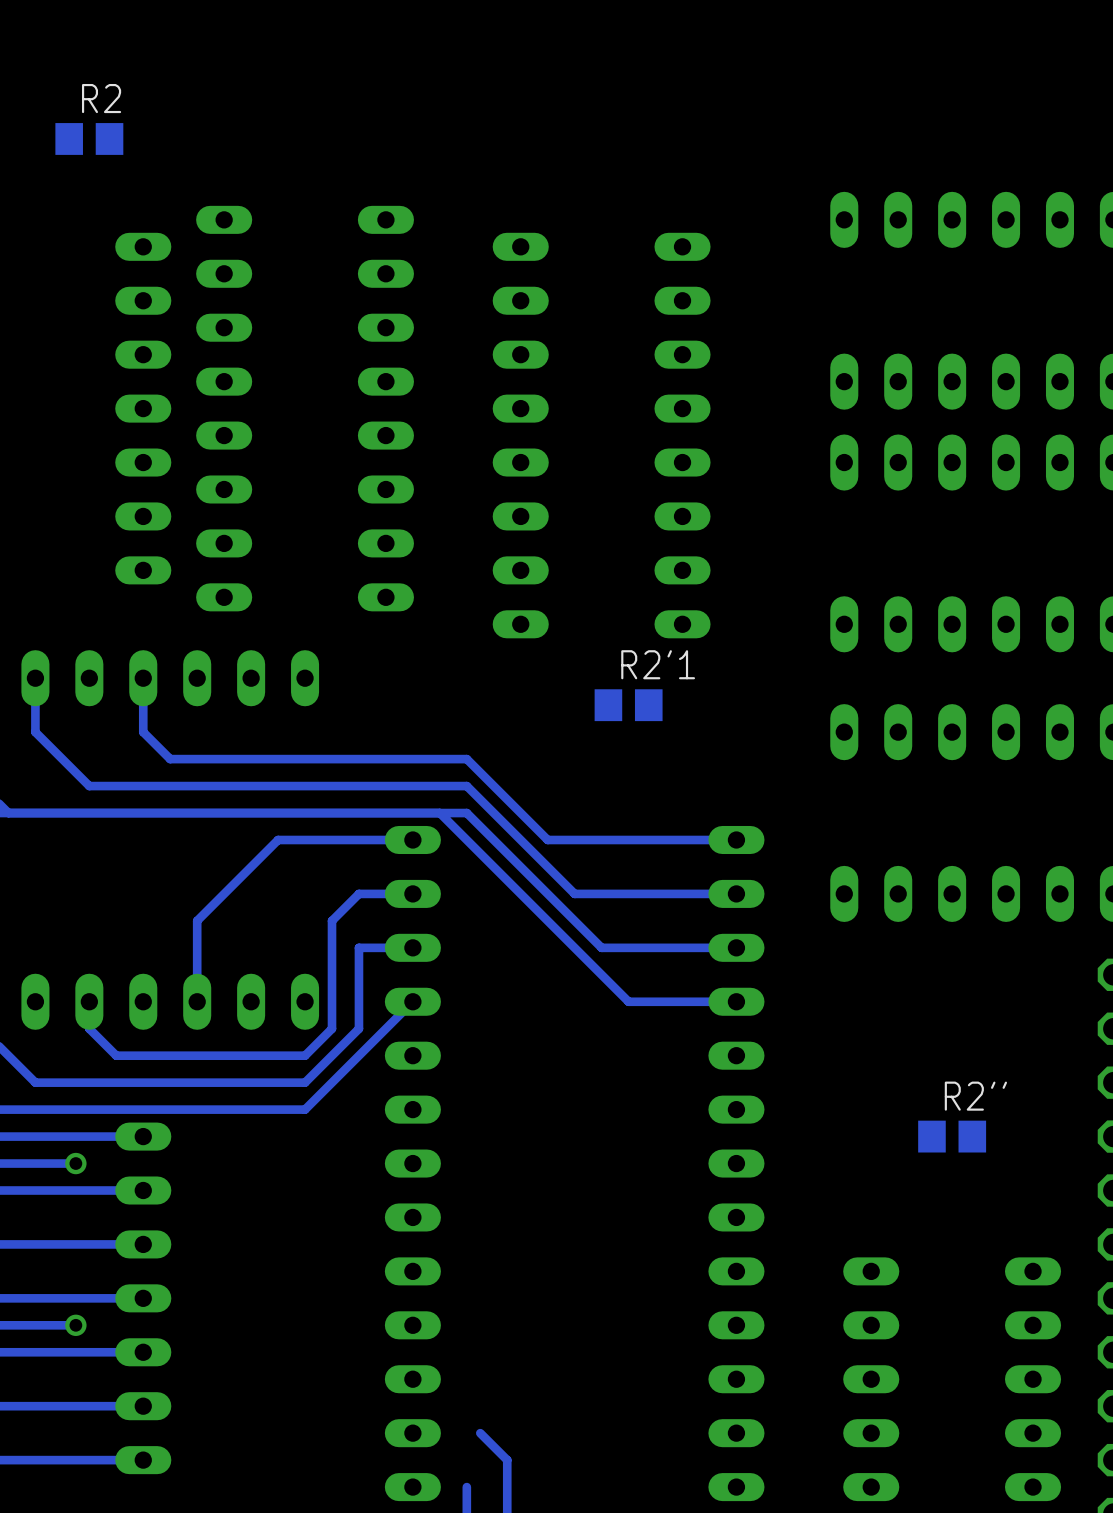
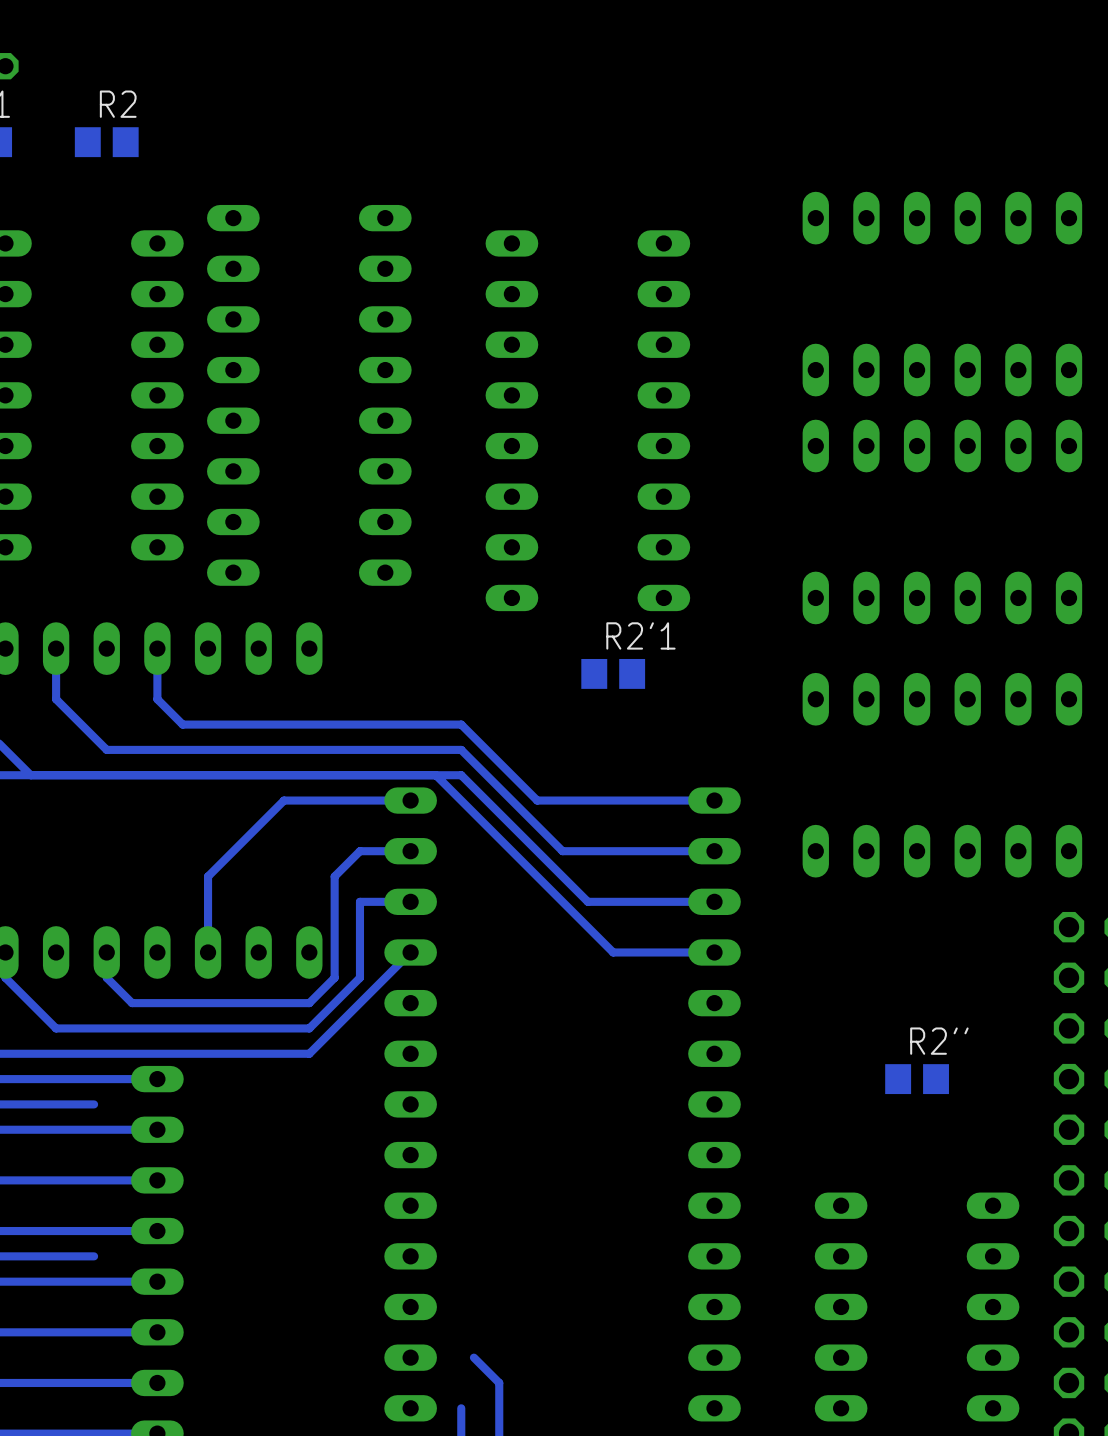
via: (75, 1163) -> none
via: (75, 1325) -> none

